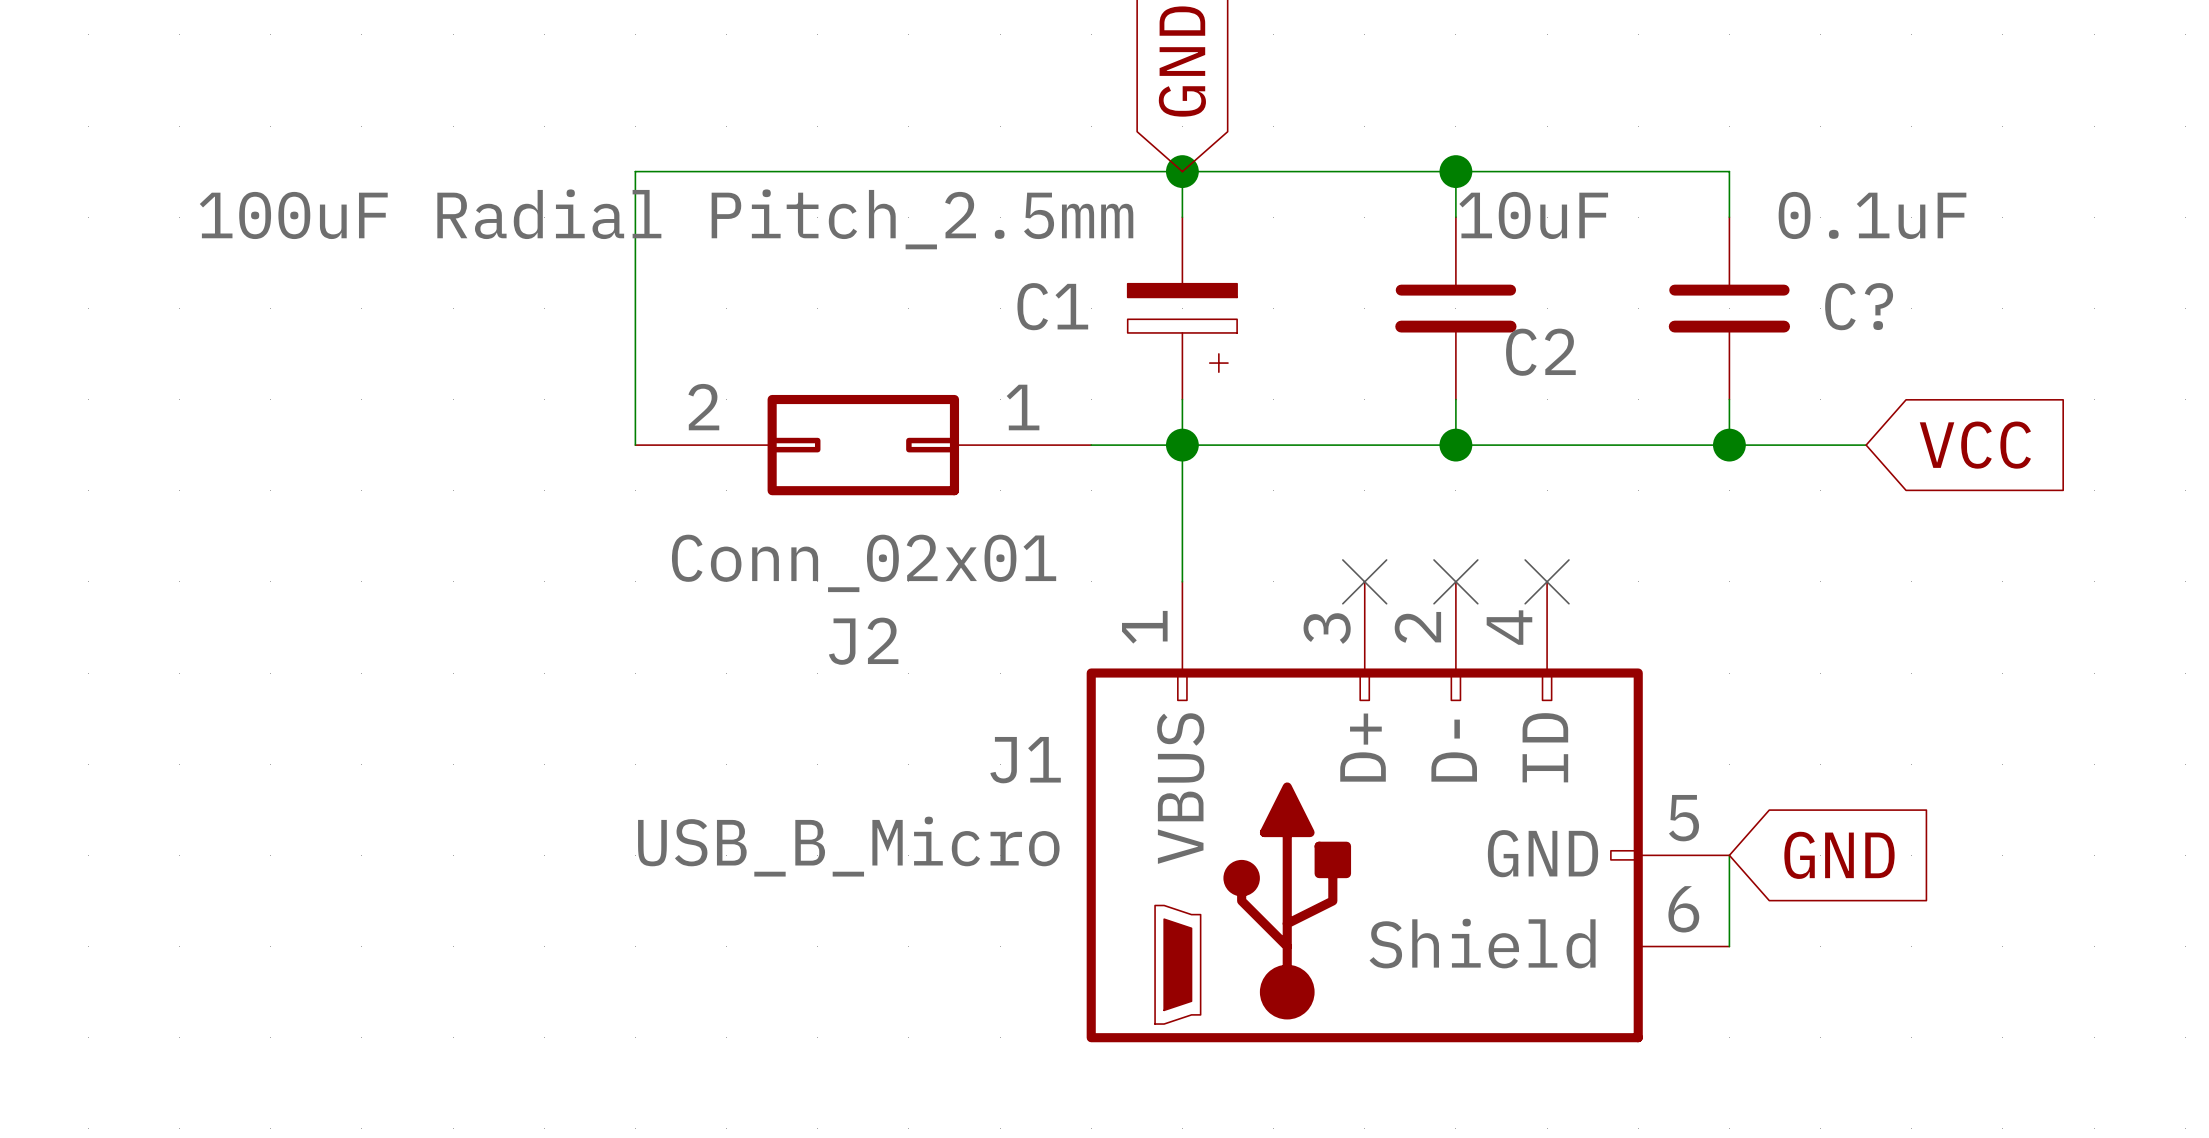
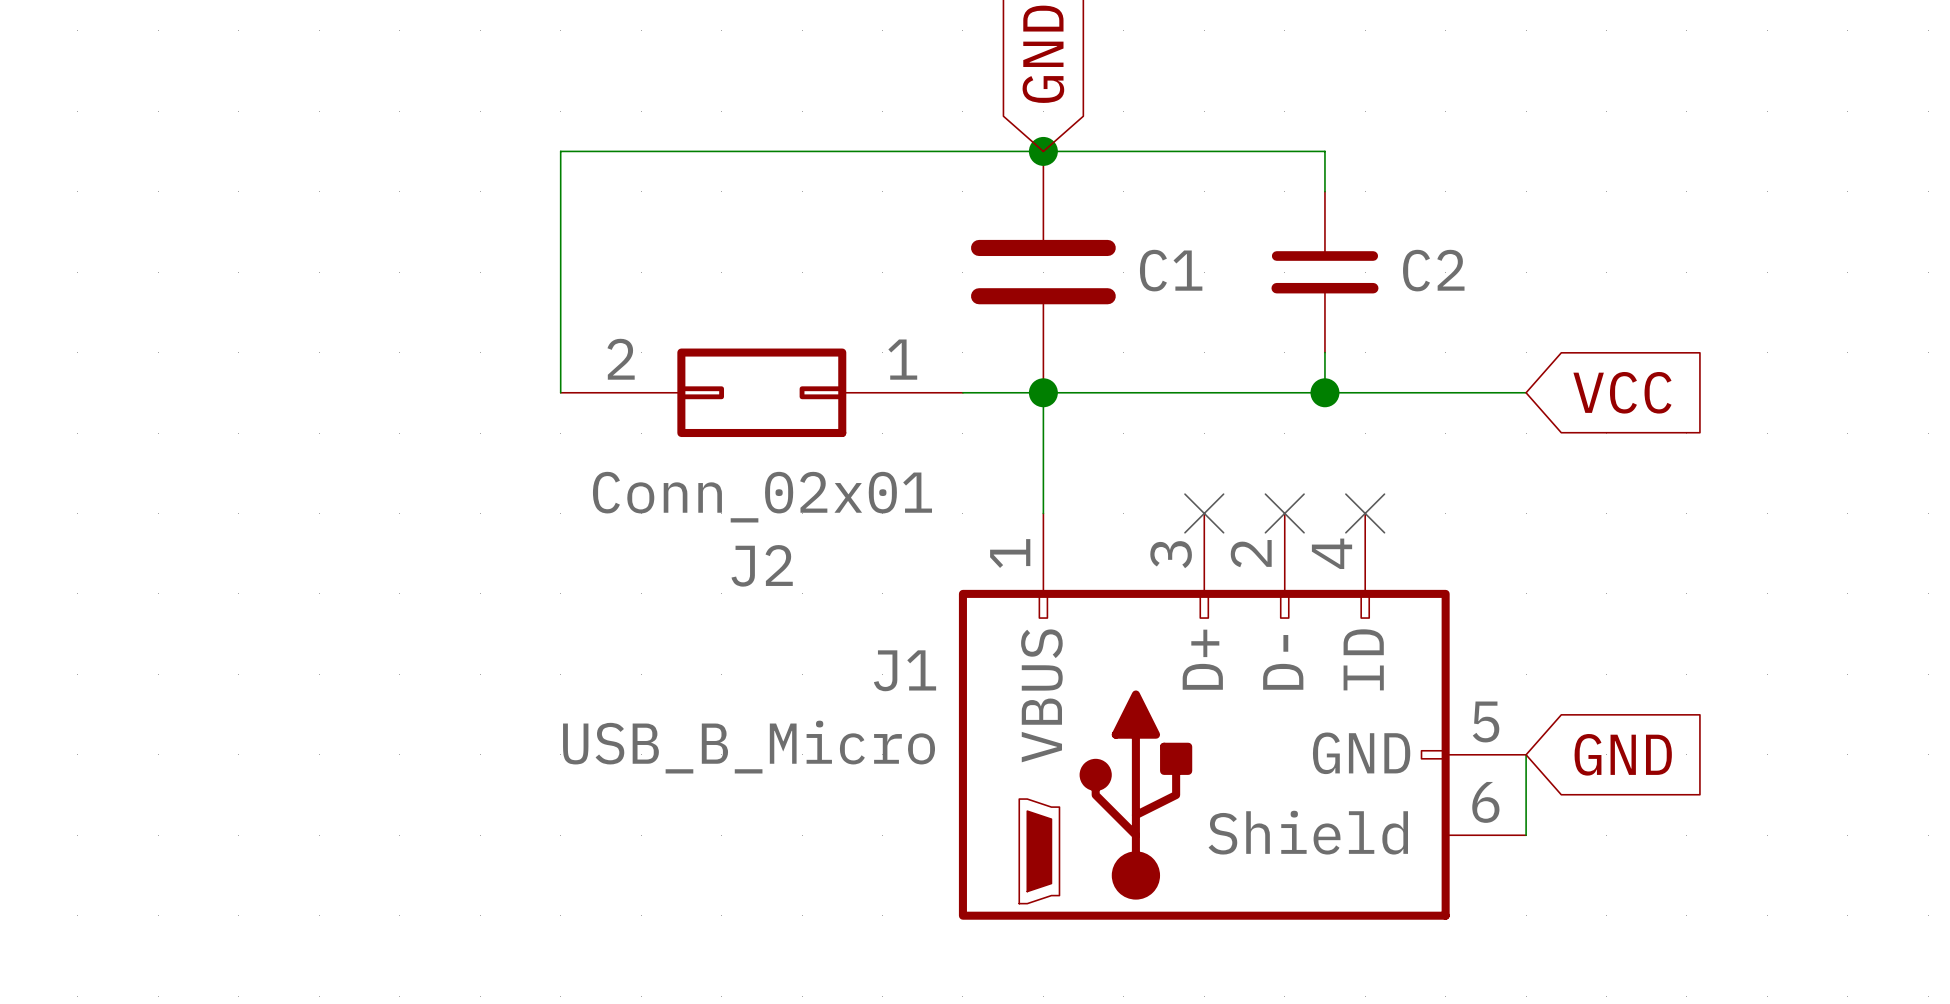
wire: (1455, 171) (1455, 217) -> none
junction: (1455, 171) -> none
wire: (1501, 171) (1729, 171) (1729, 217) -> (1324, 151) (1324, 191)
C2 value: 10uF (1533, 215) -> none
C1 symbol: [1127, 217, 1238, 400] -> [970, 151, 1116, 393]
C1 value: 100uF Radial Pitch_2.5mm (666, 219) -> none
C1 name position: C1 (1052, 306) -> C1 (1171, 270)
C2 position: (1455, 308) -> (1324, 272)
C?: 0.1uF (1729, 308) -> none
C2 name position: C2 (1540, 352) -> C2 (1433, 270)
wire: (1455, 399) (1455, 445) -> (1324, 352) (1324, 392)
wire: (1729, 399) (1729, 445) (1866, 445) -> none
junction position: (1455, 445) -> (1324, 392)
junction: (1729, 445) -> none
global label position: VCC (1975, 445) -> VCC (1622, 392)

